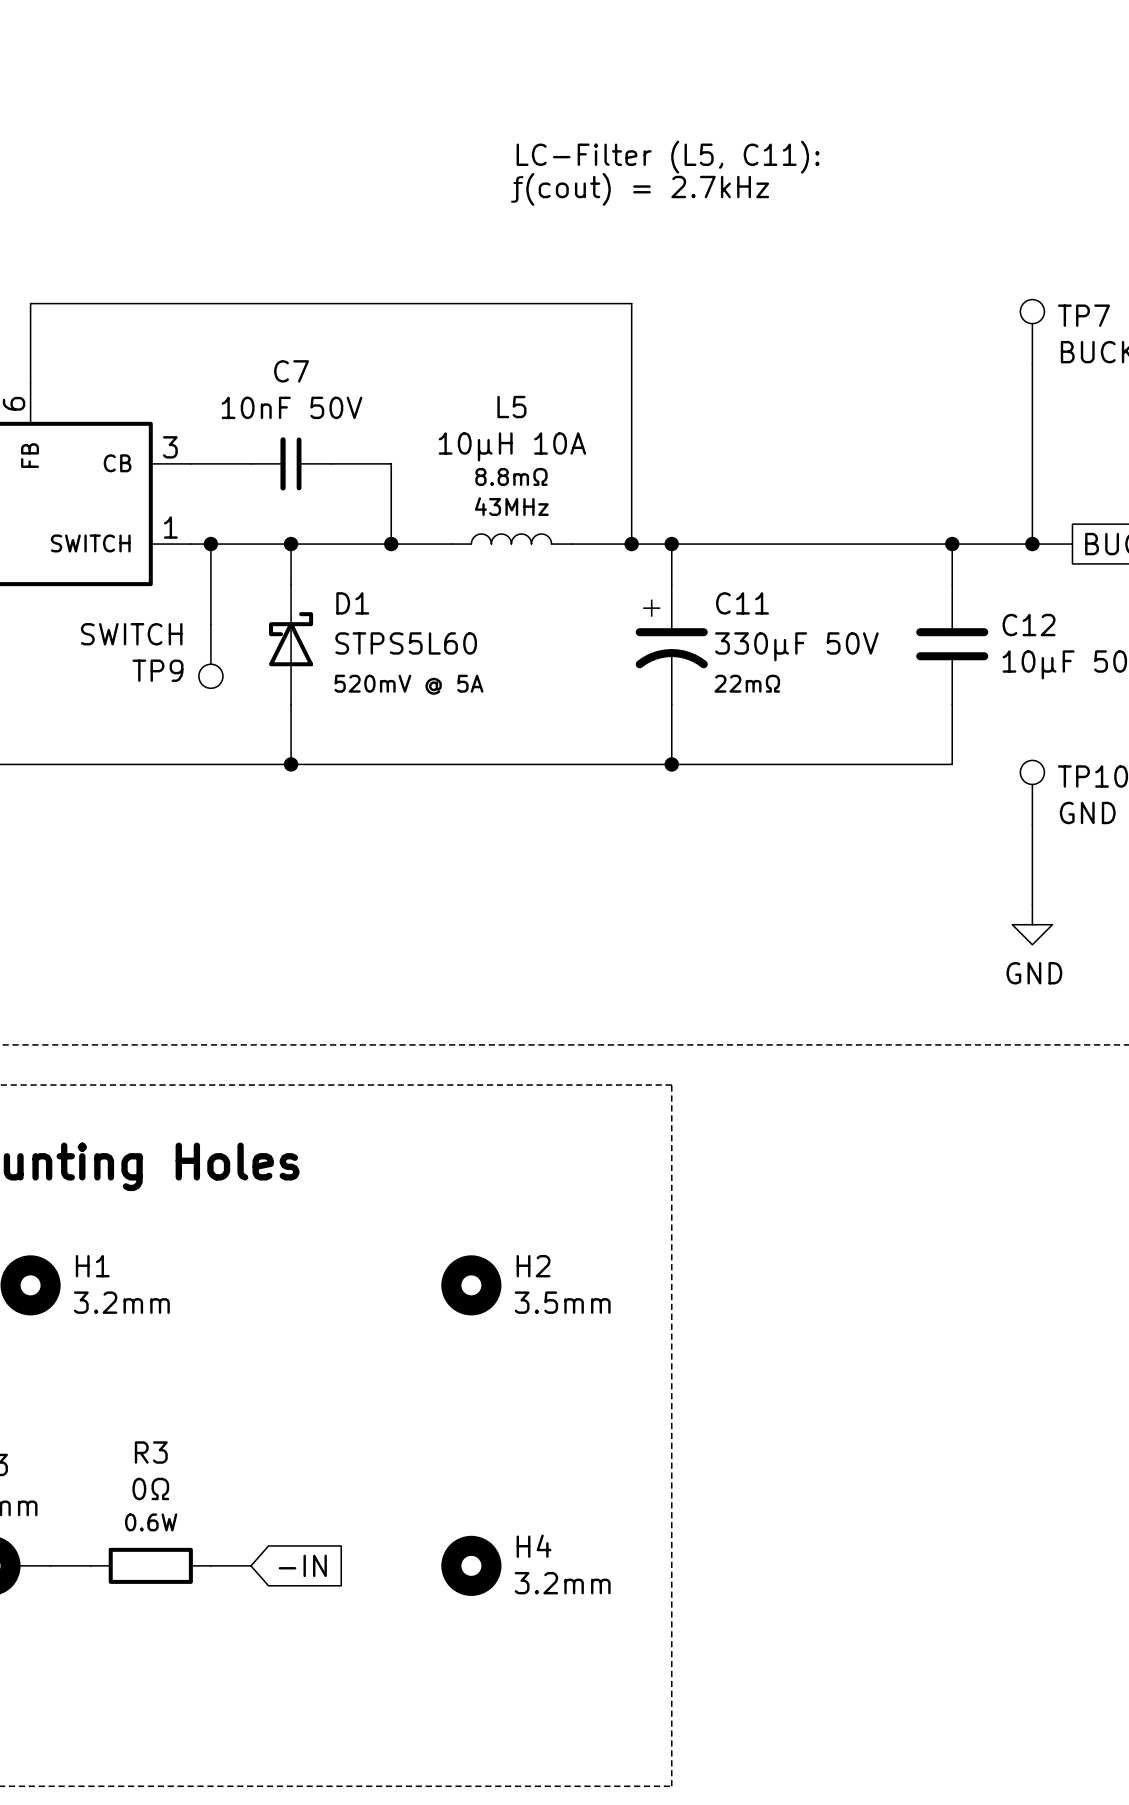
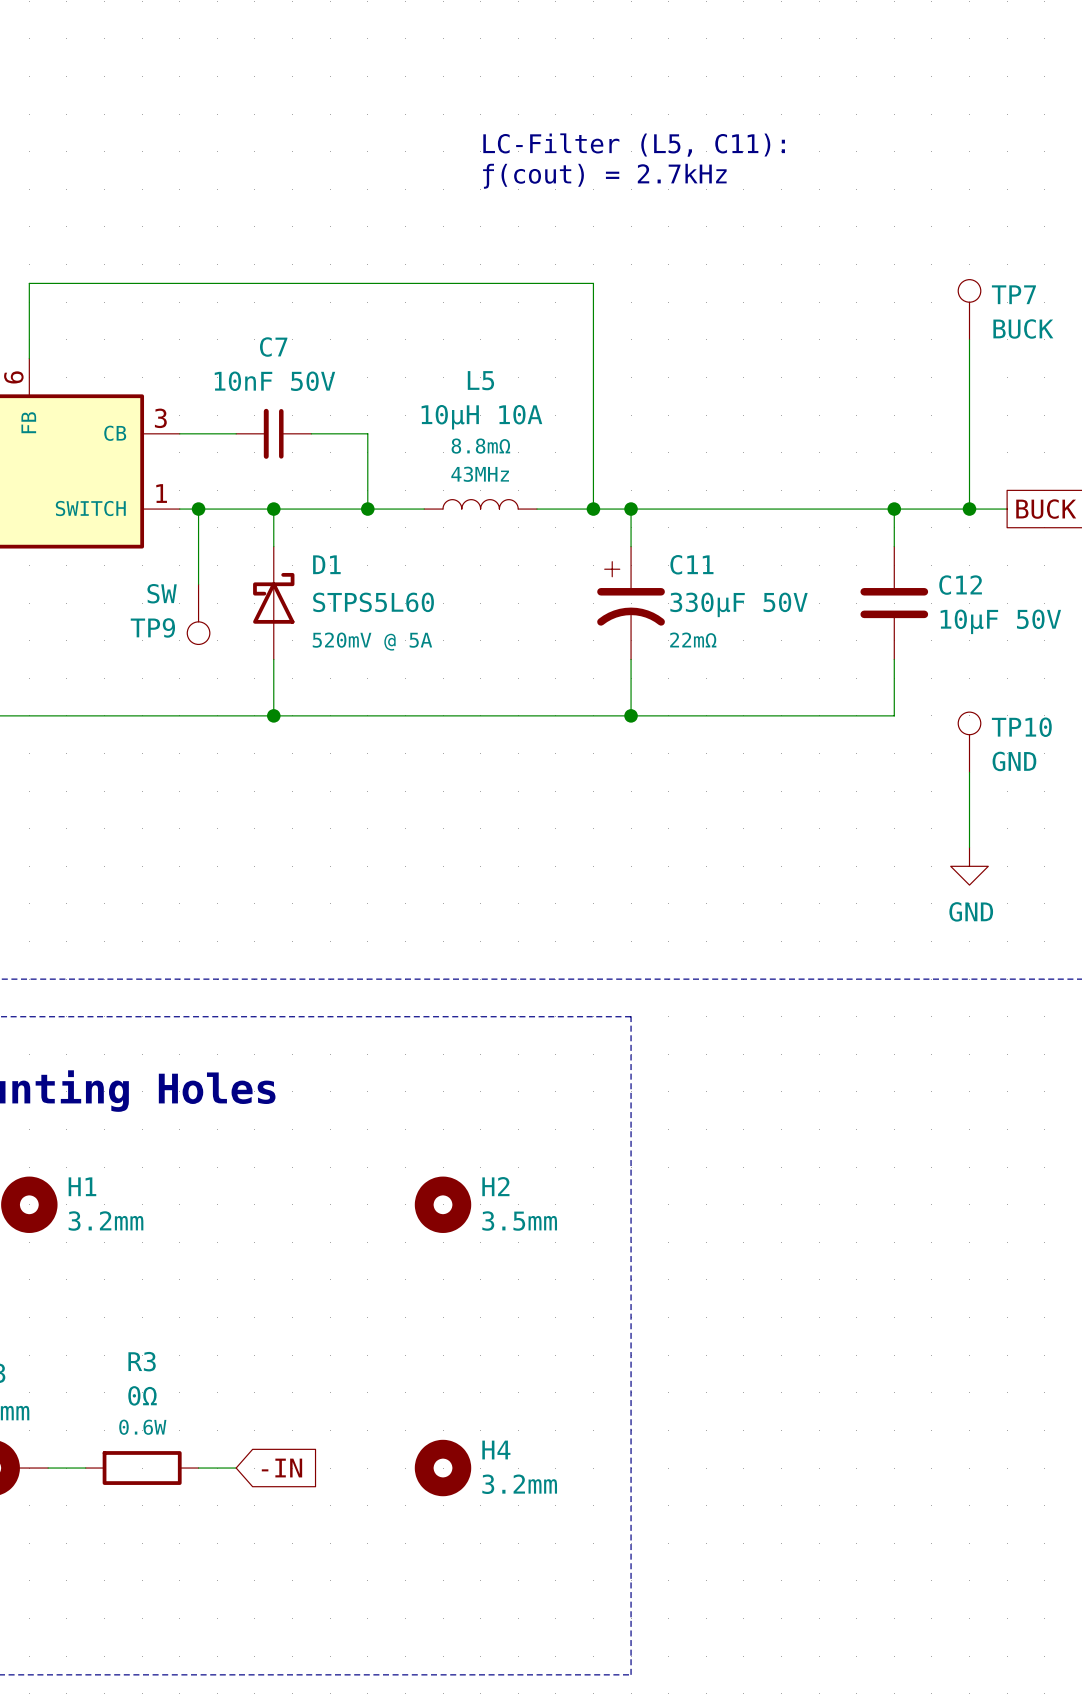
TP9 value: SWITCH (131, 634) -> SW (162, 593)

